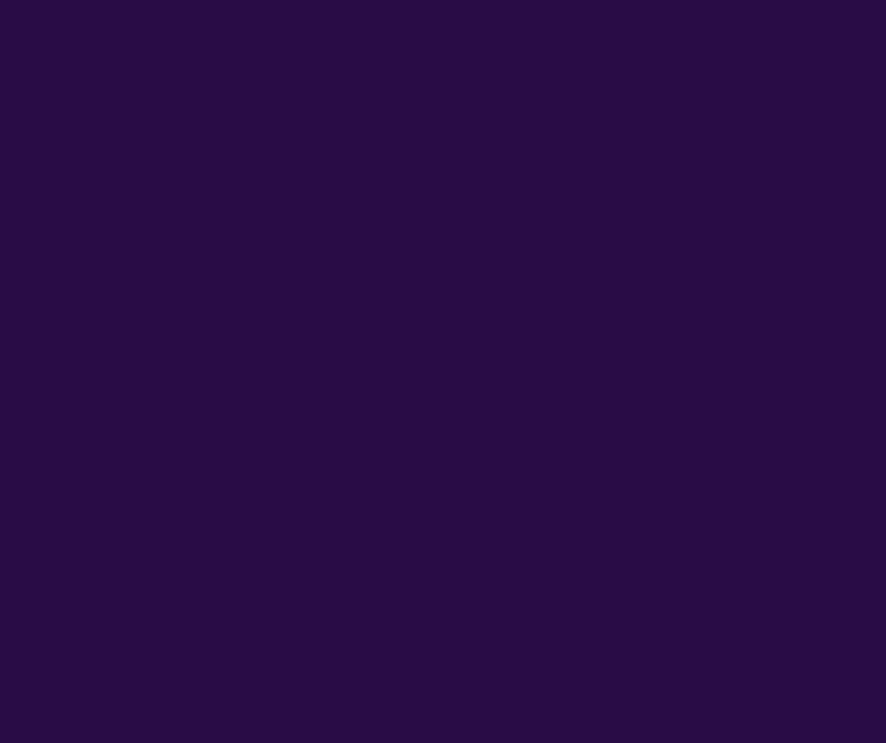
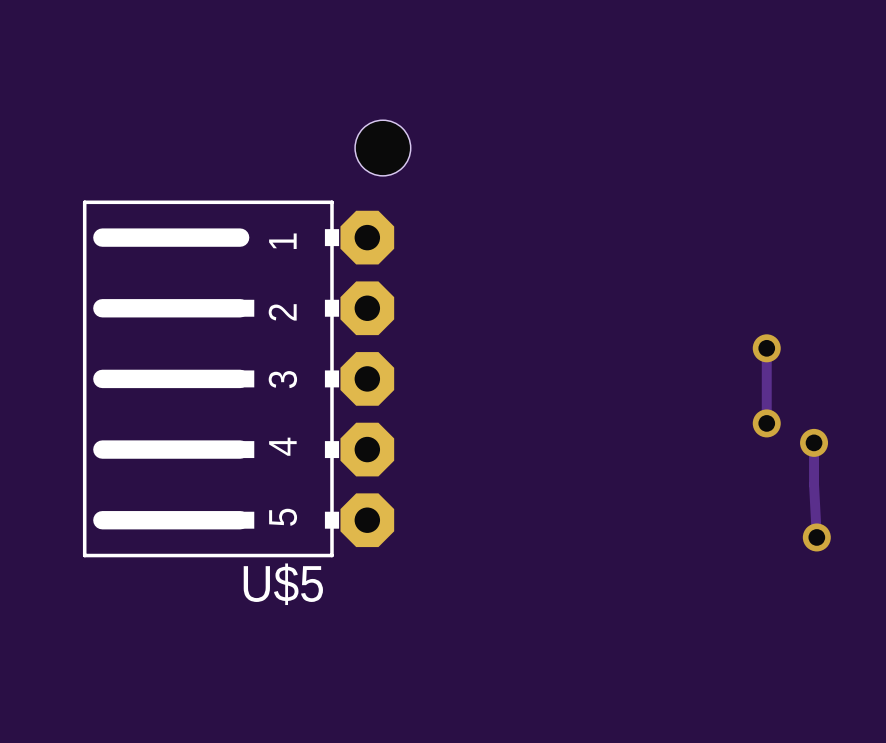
hole: none -> (382, 148)
track: none -> (766, 348) (766, 423)
via: none -> (766, 348)
U$5: none -> (238, 378)
via: none -> (766, 423)
track: none -> (814, 442) (816, 537)
via: none -> (814, 442)
via: none -> (816, 537)

